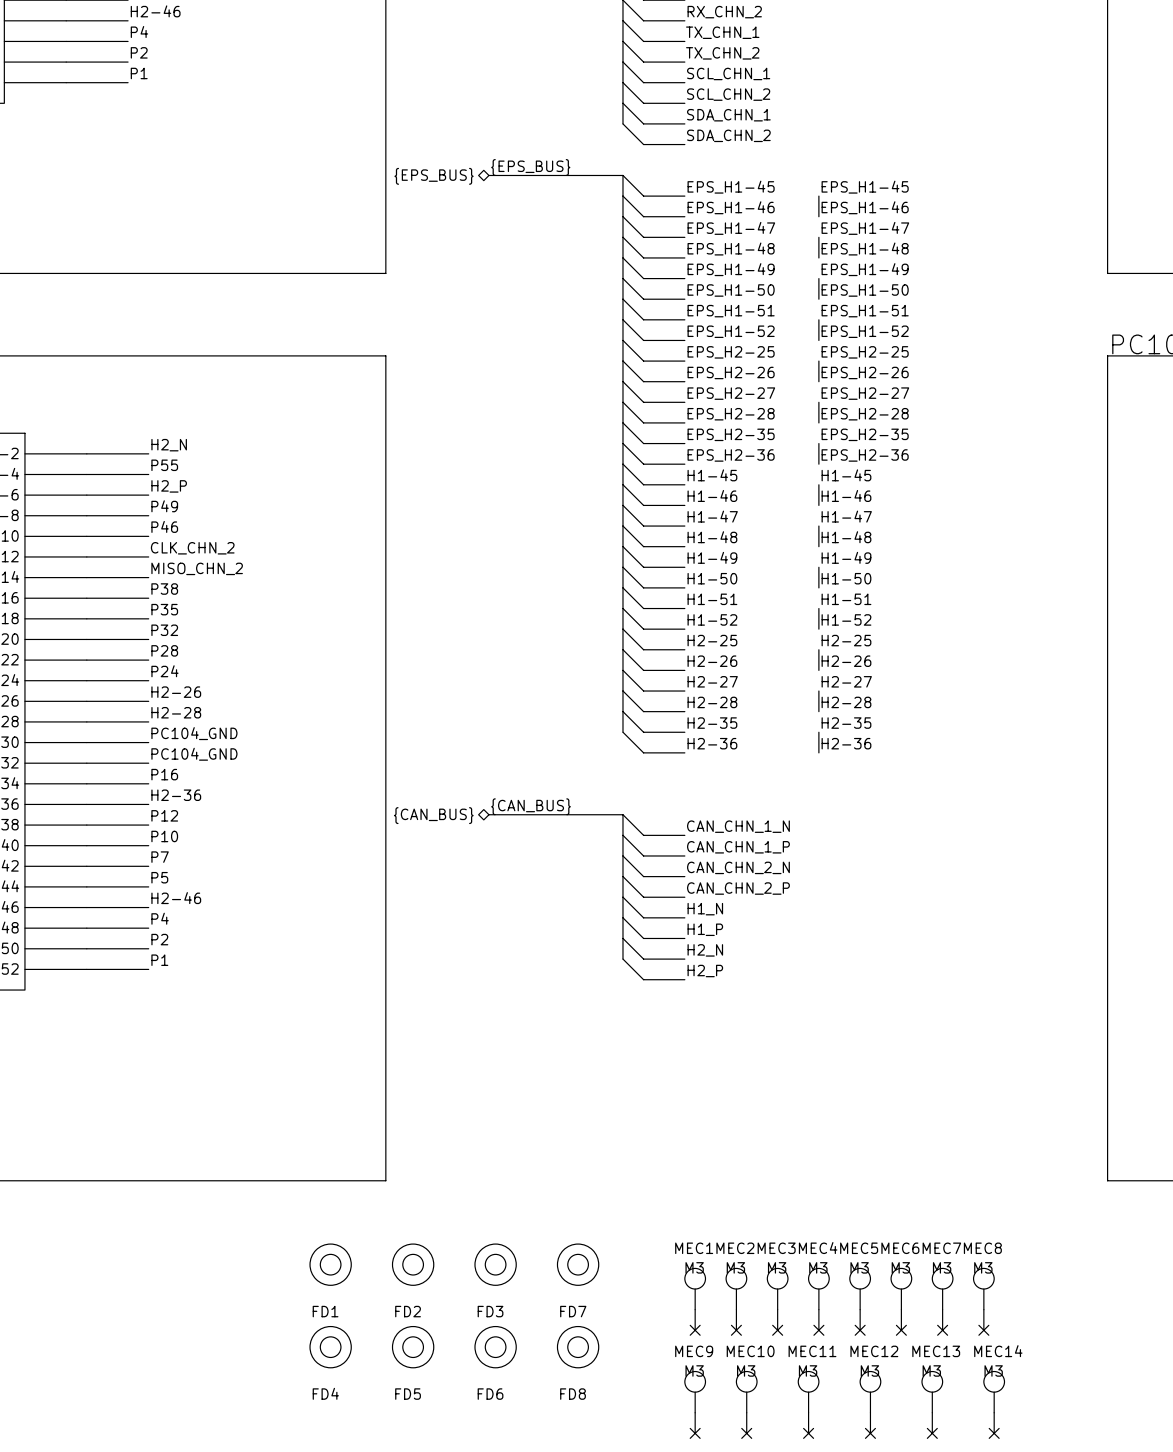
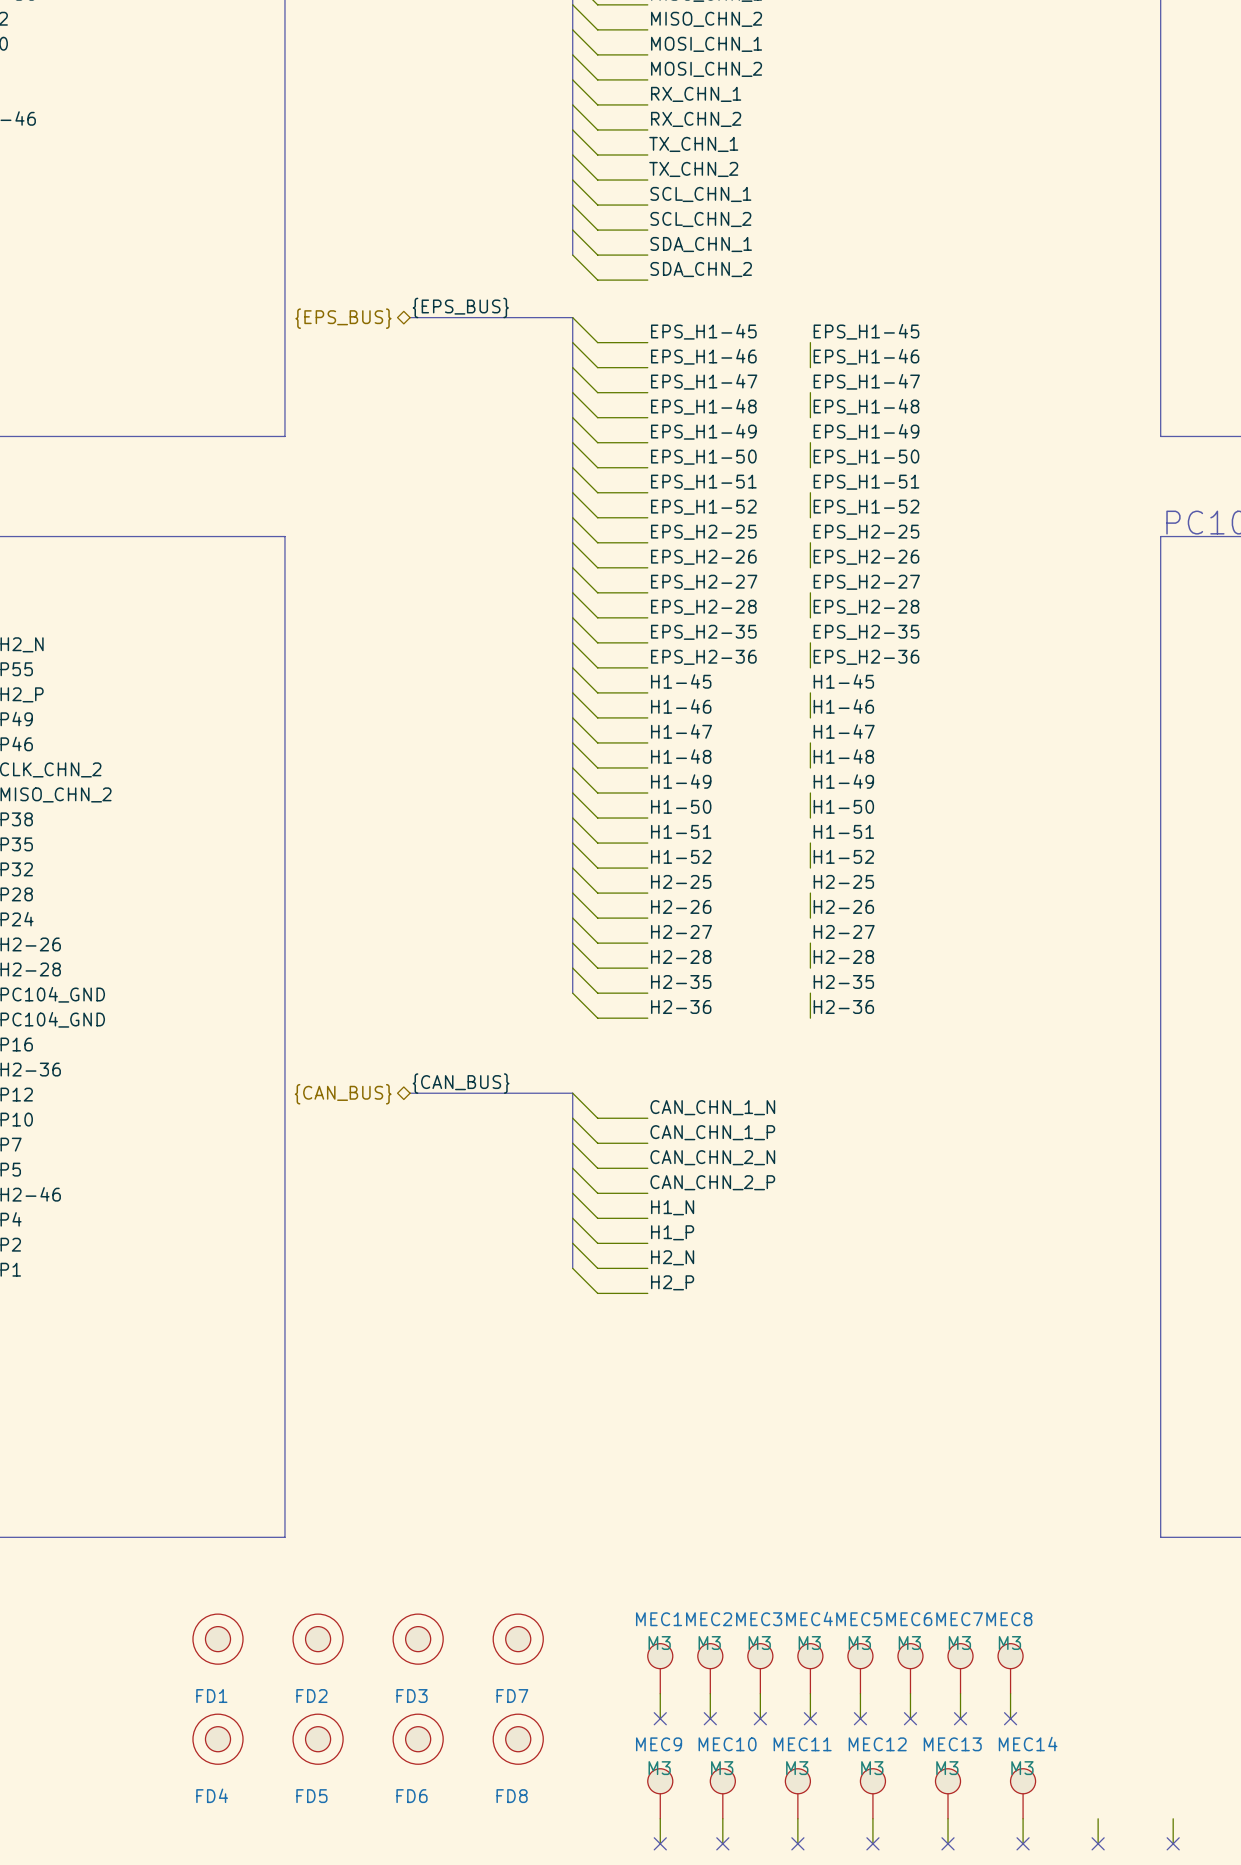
wire: none -> (1098, 1818) (1098, 1843)
wire: none -> (1173, 1818) (1173, 1843)
no-connect mark: none -> (1098, 1843)
no-connect mark: none -> (1173, 1843)

